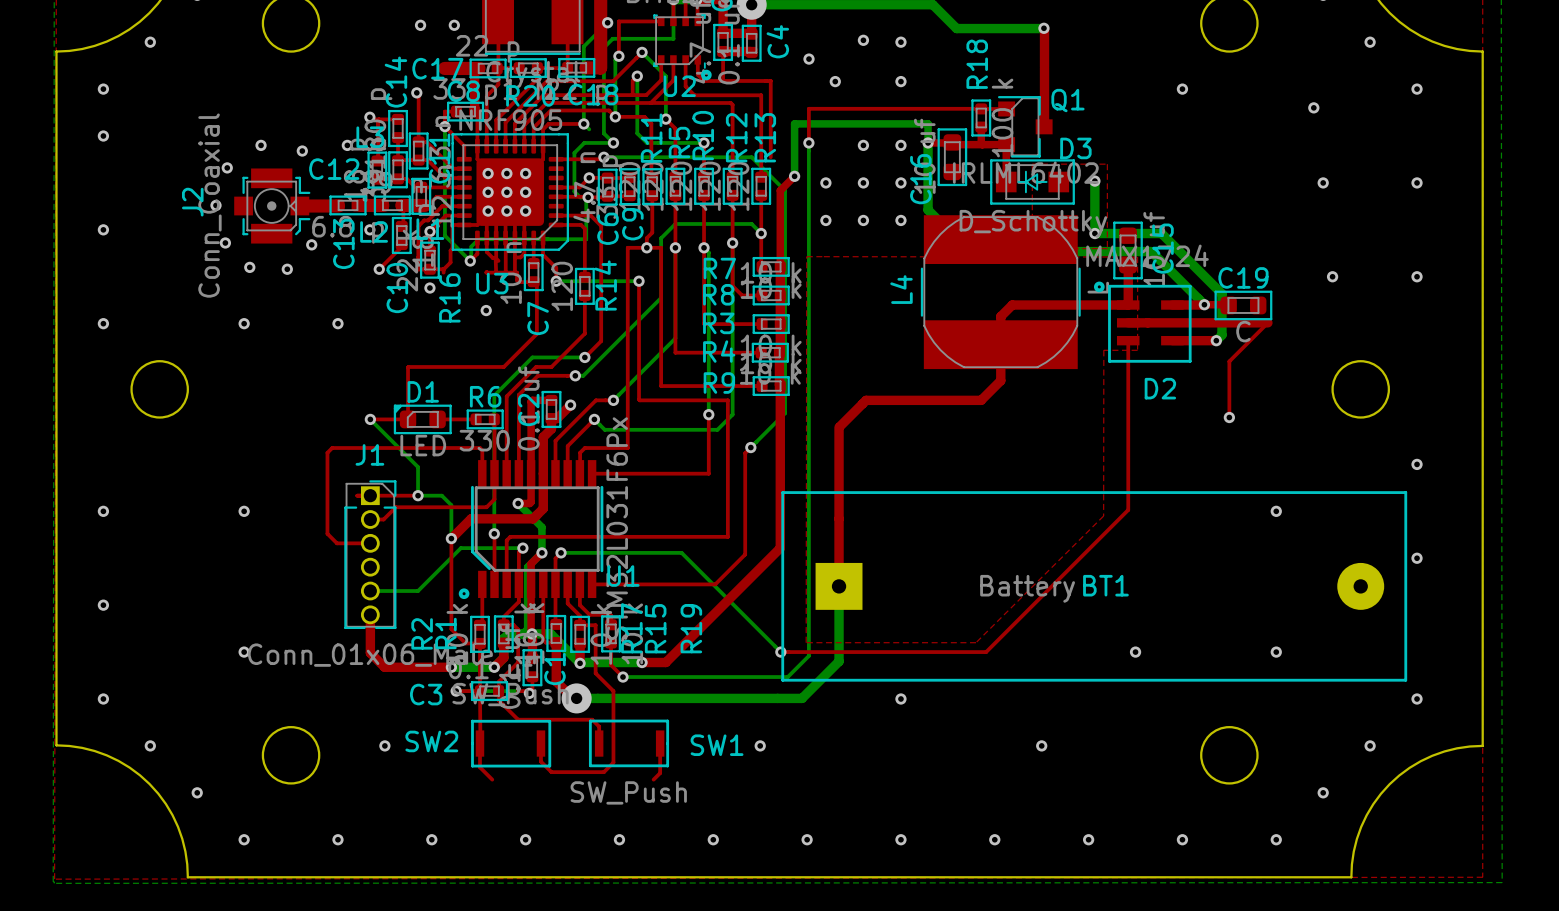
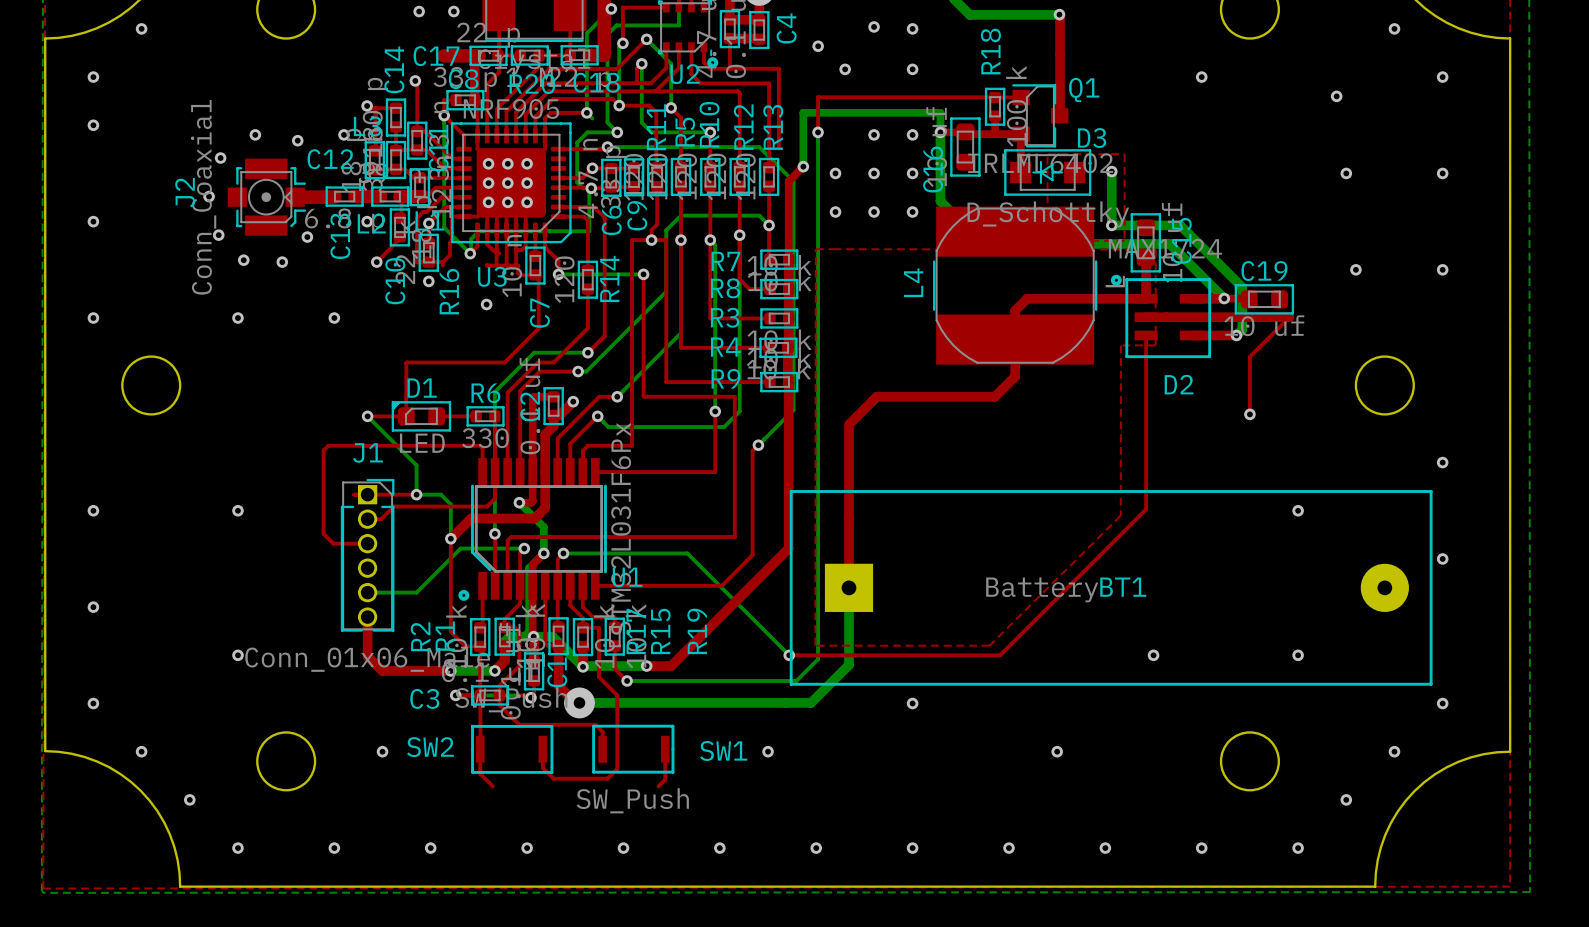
C19 value: C (1243, 331) -> 10 uf (1264, 325)

